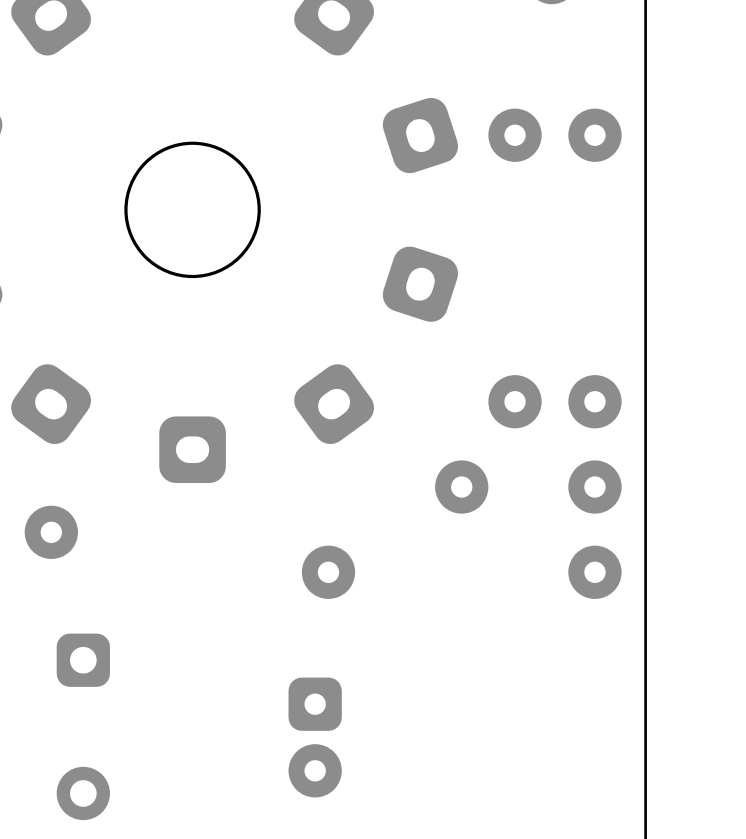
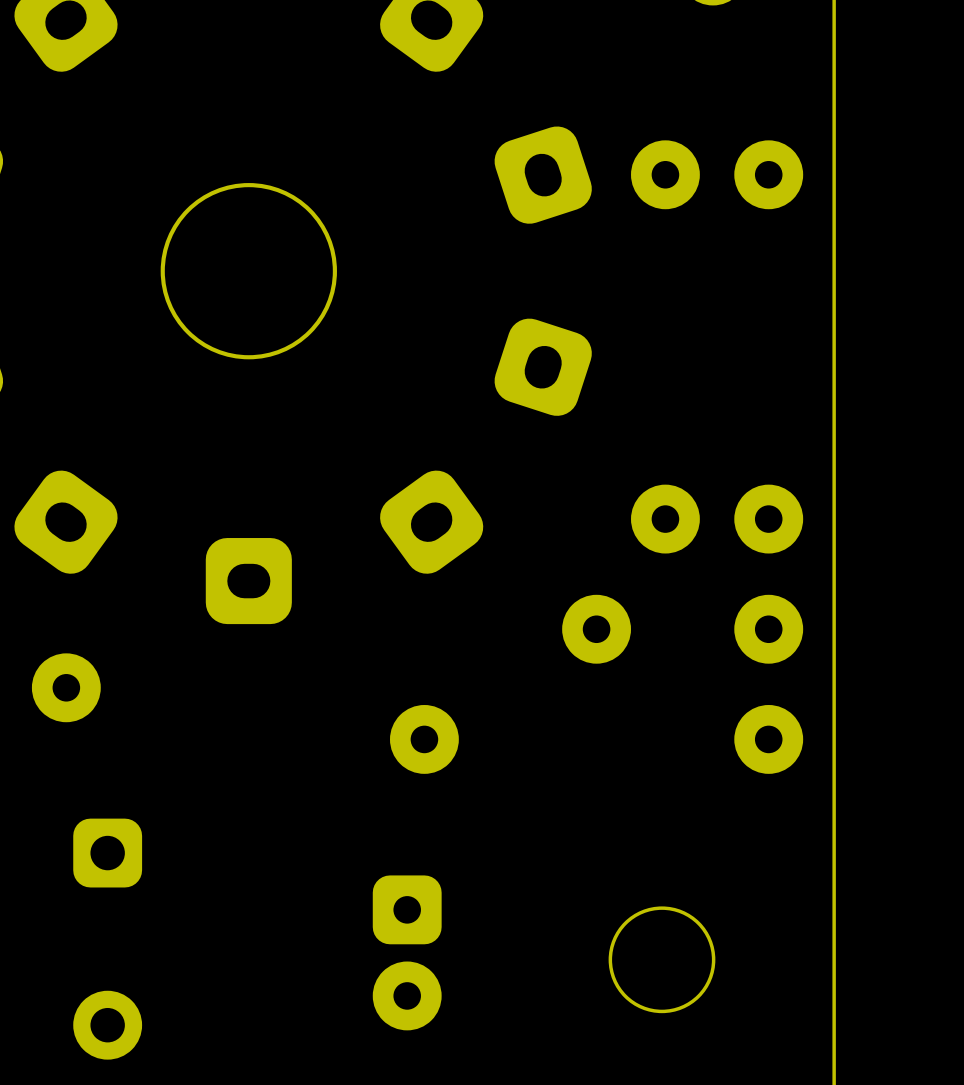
round board edge: none -> [608, 906, 716, 1014]

